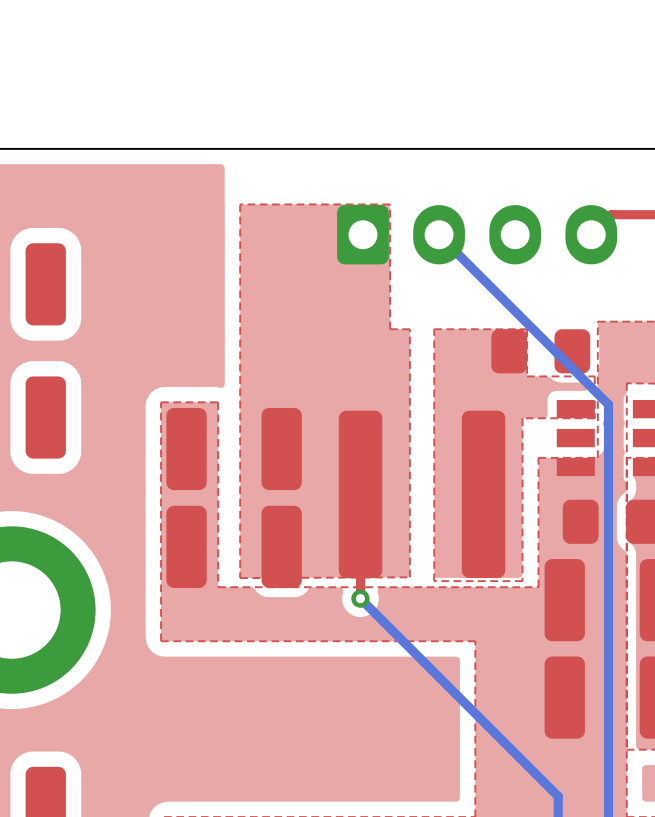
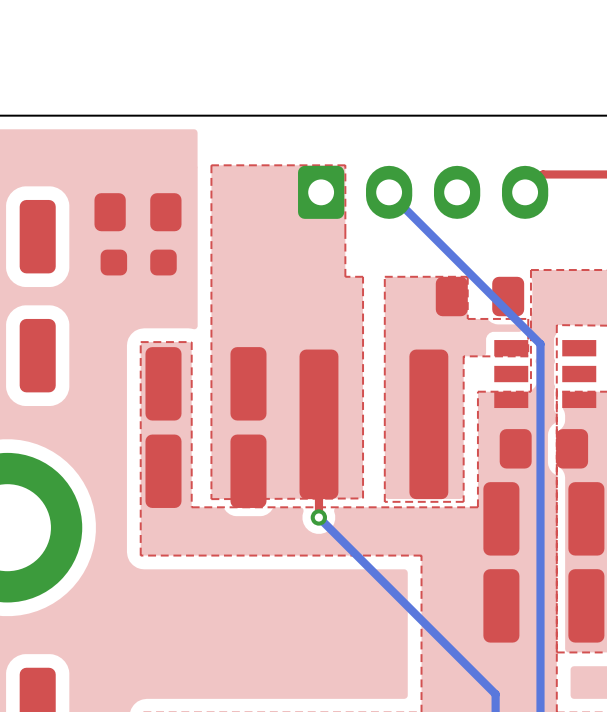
part: none -> (137, 212)
part: none -> (138, 262)

